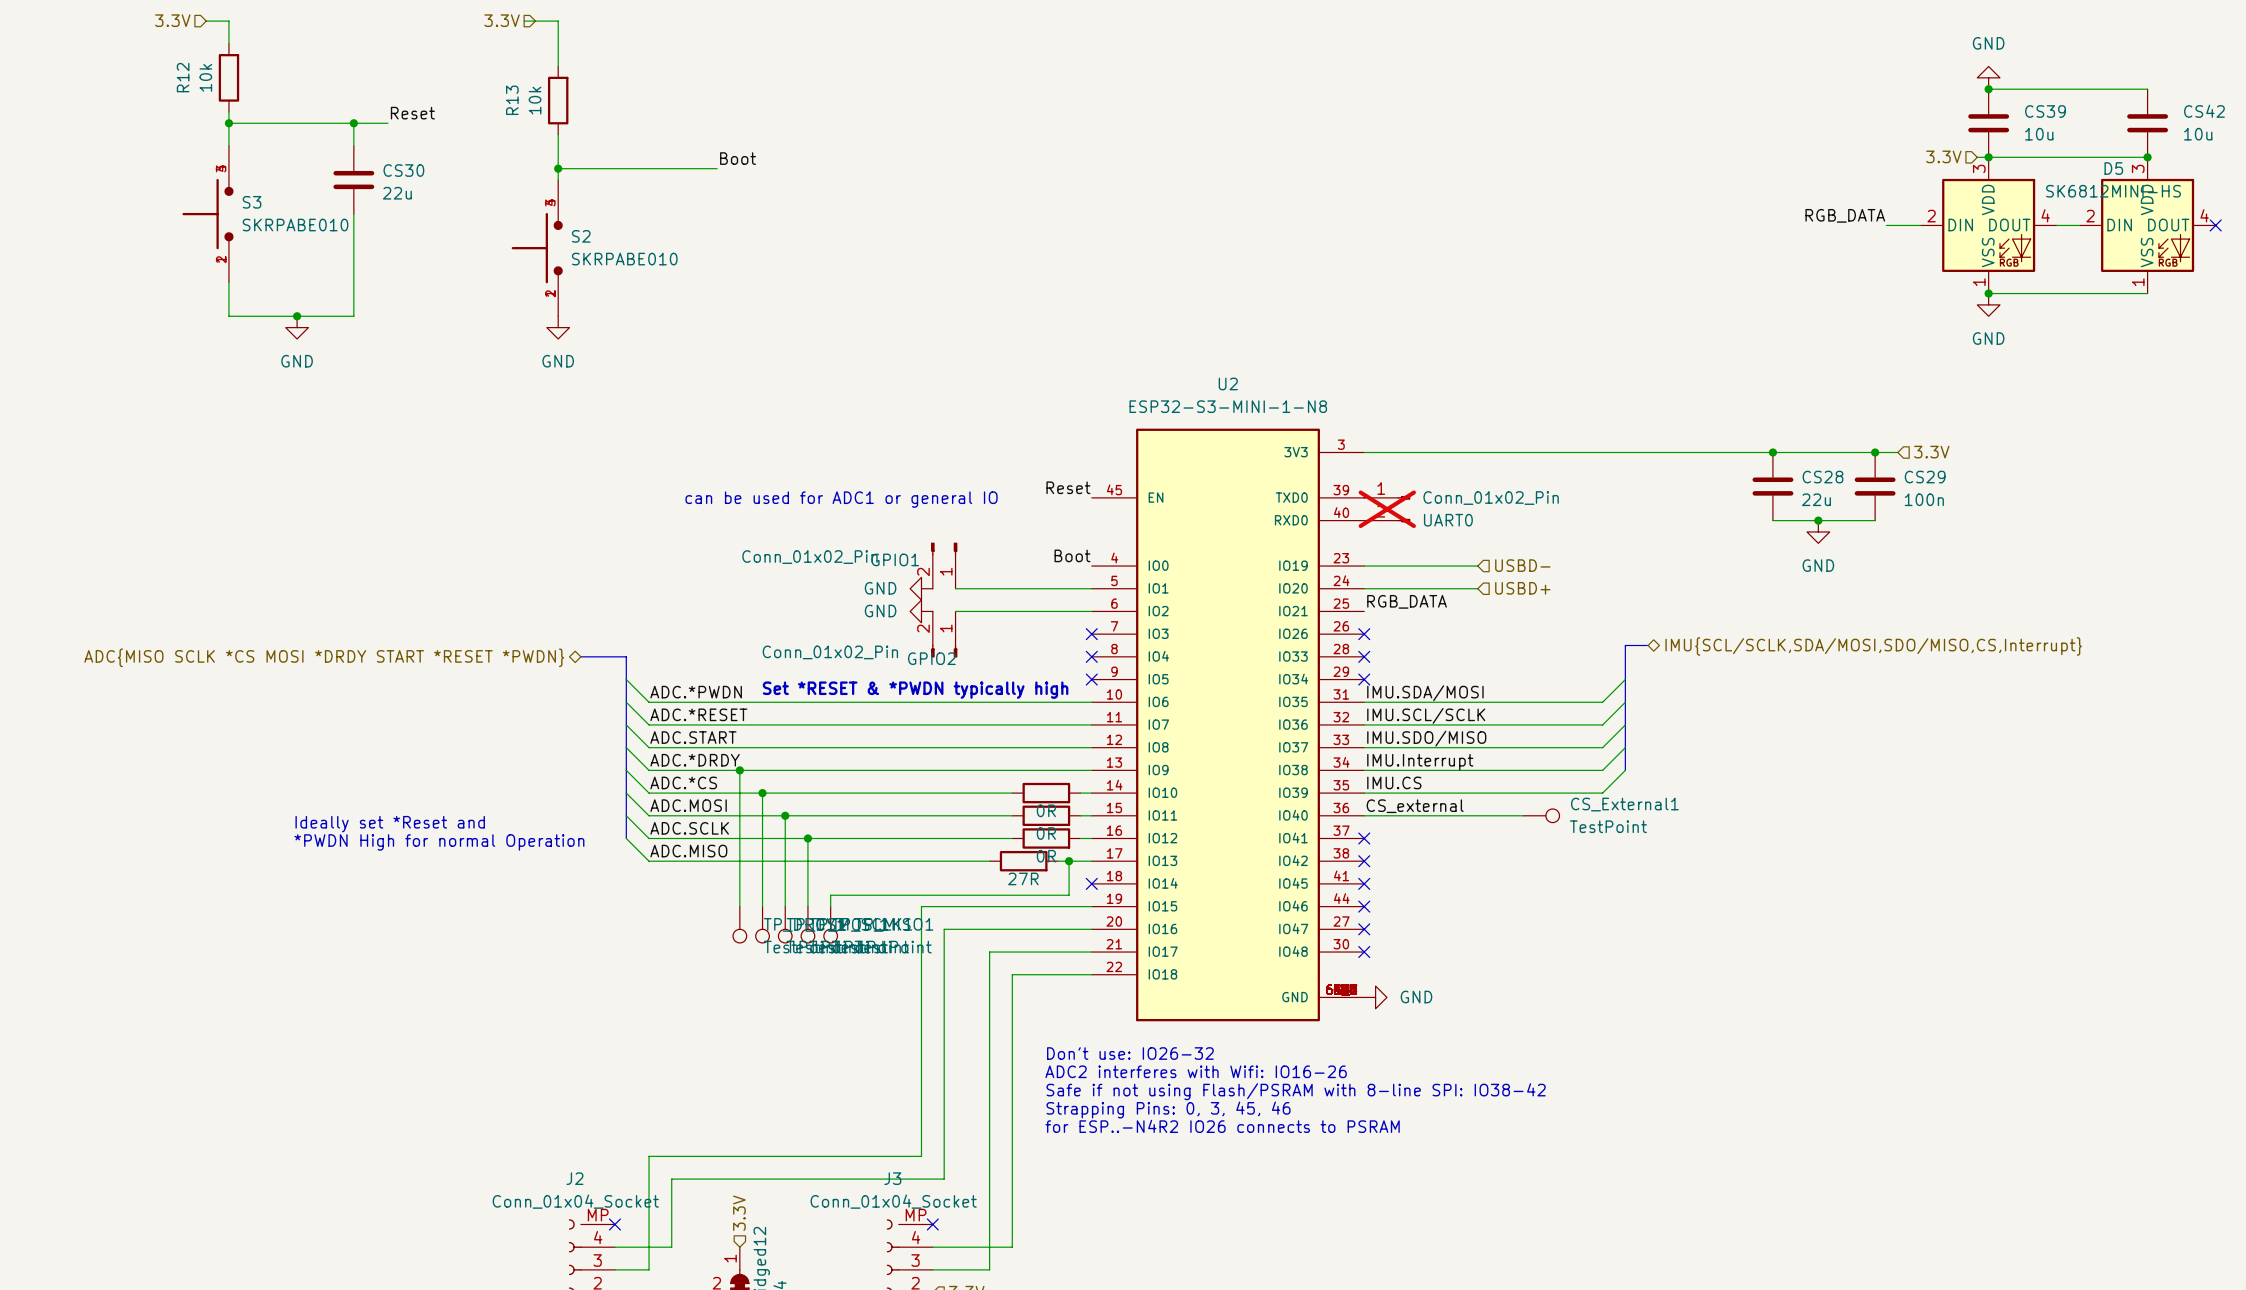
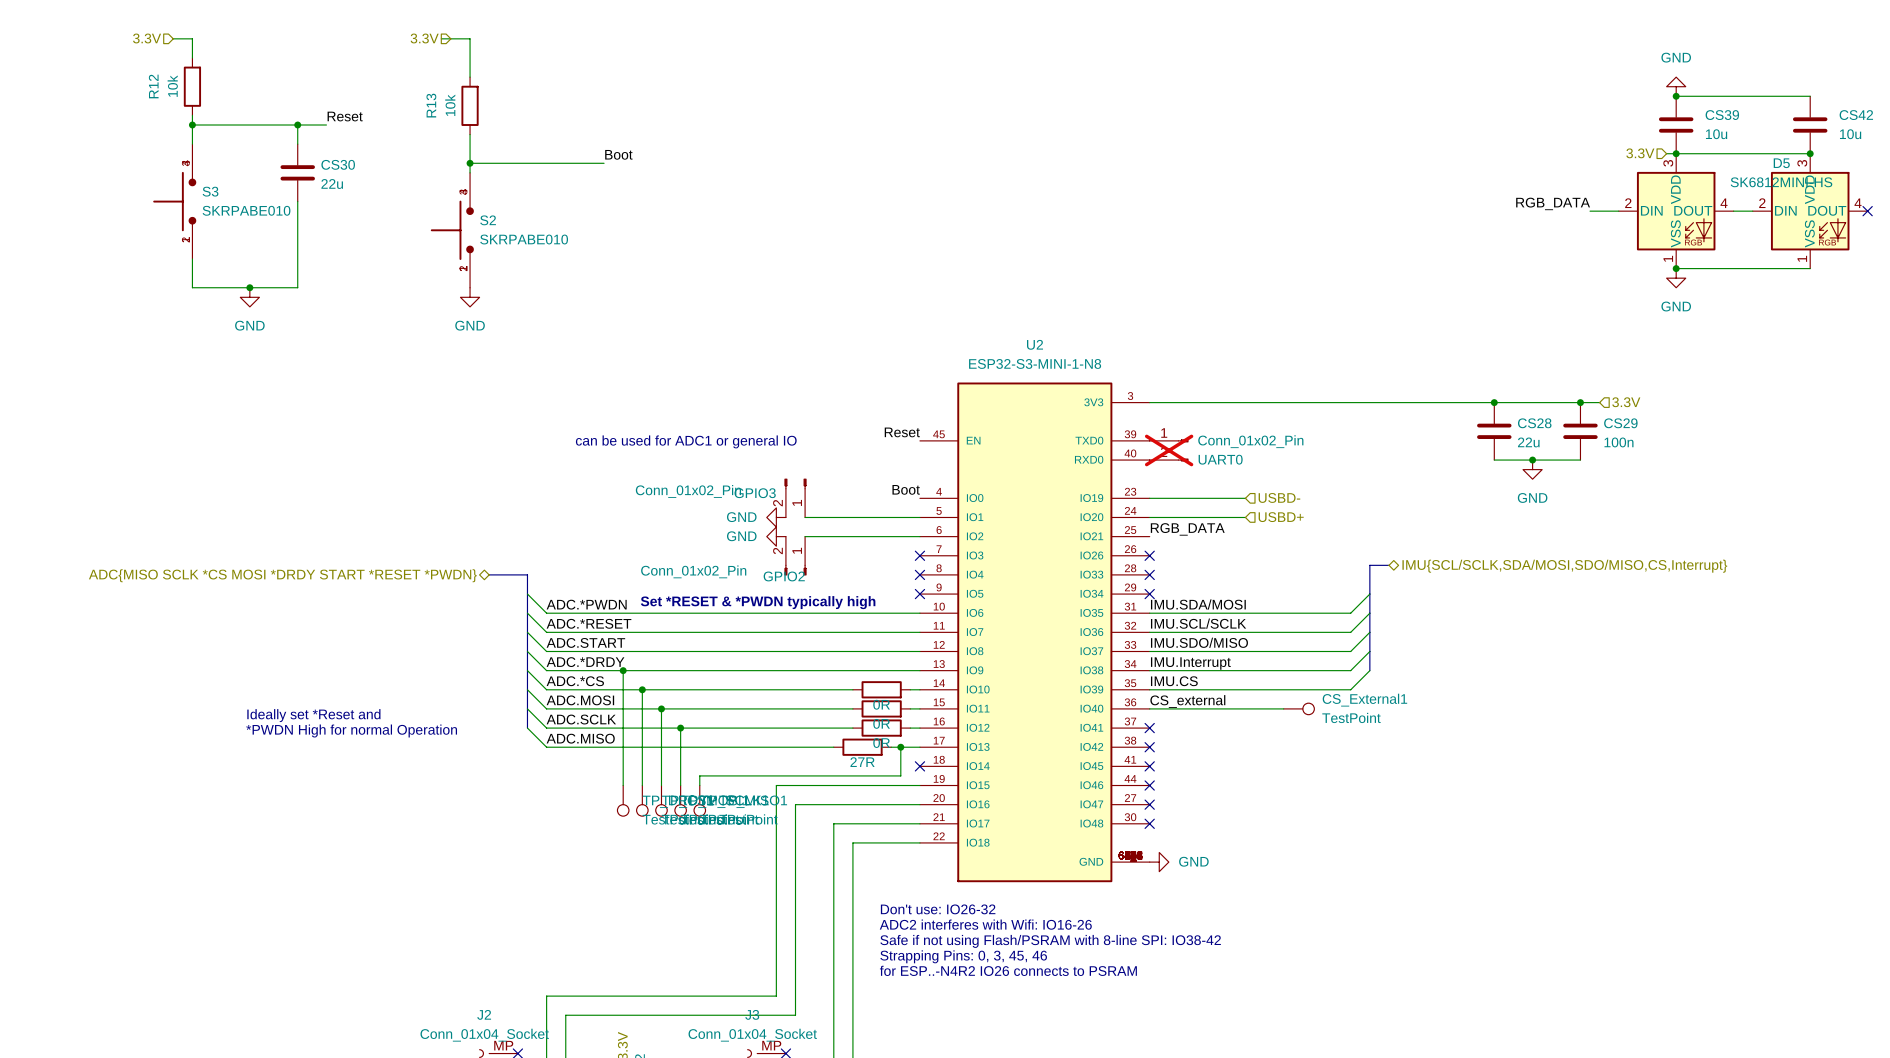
GPIO1 name: GPIO1 (895, 559) -> GPIO3 (755, 493)

